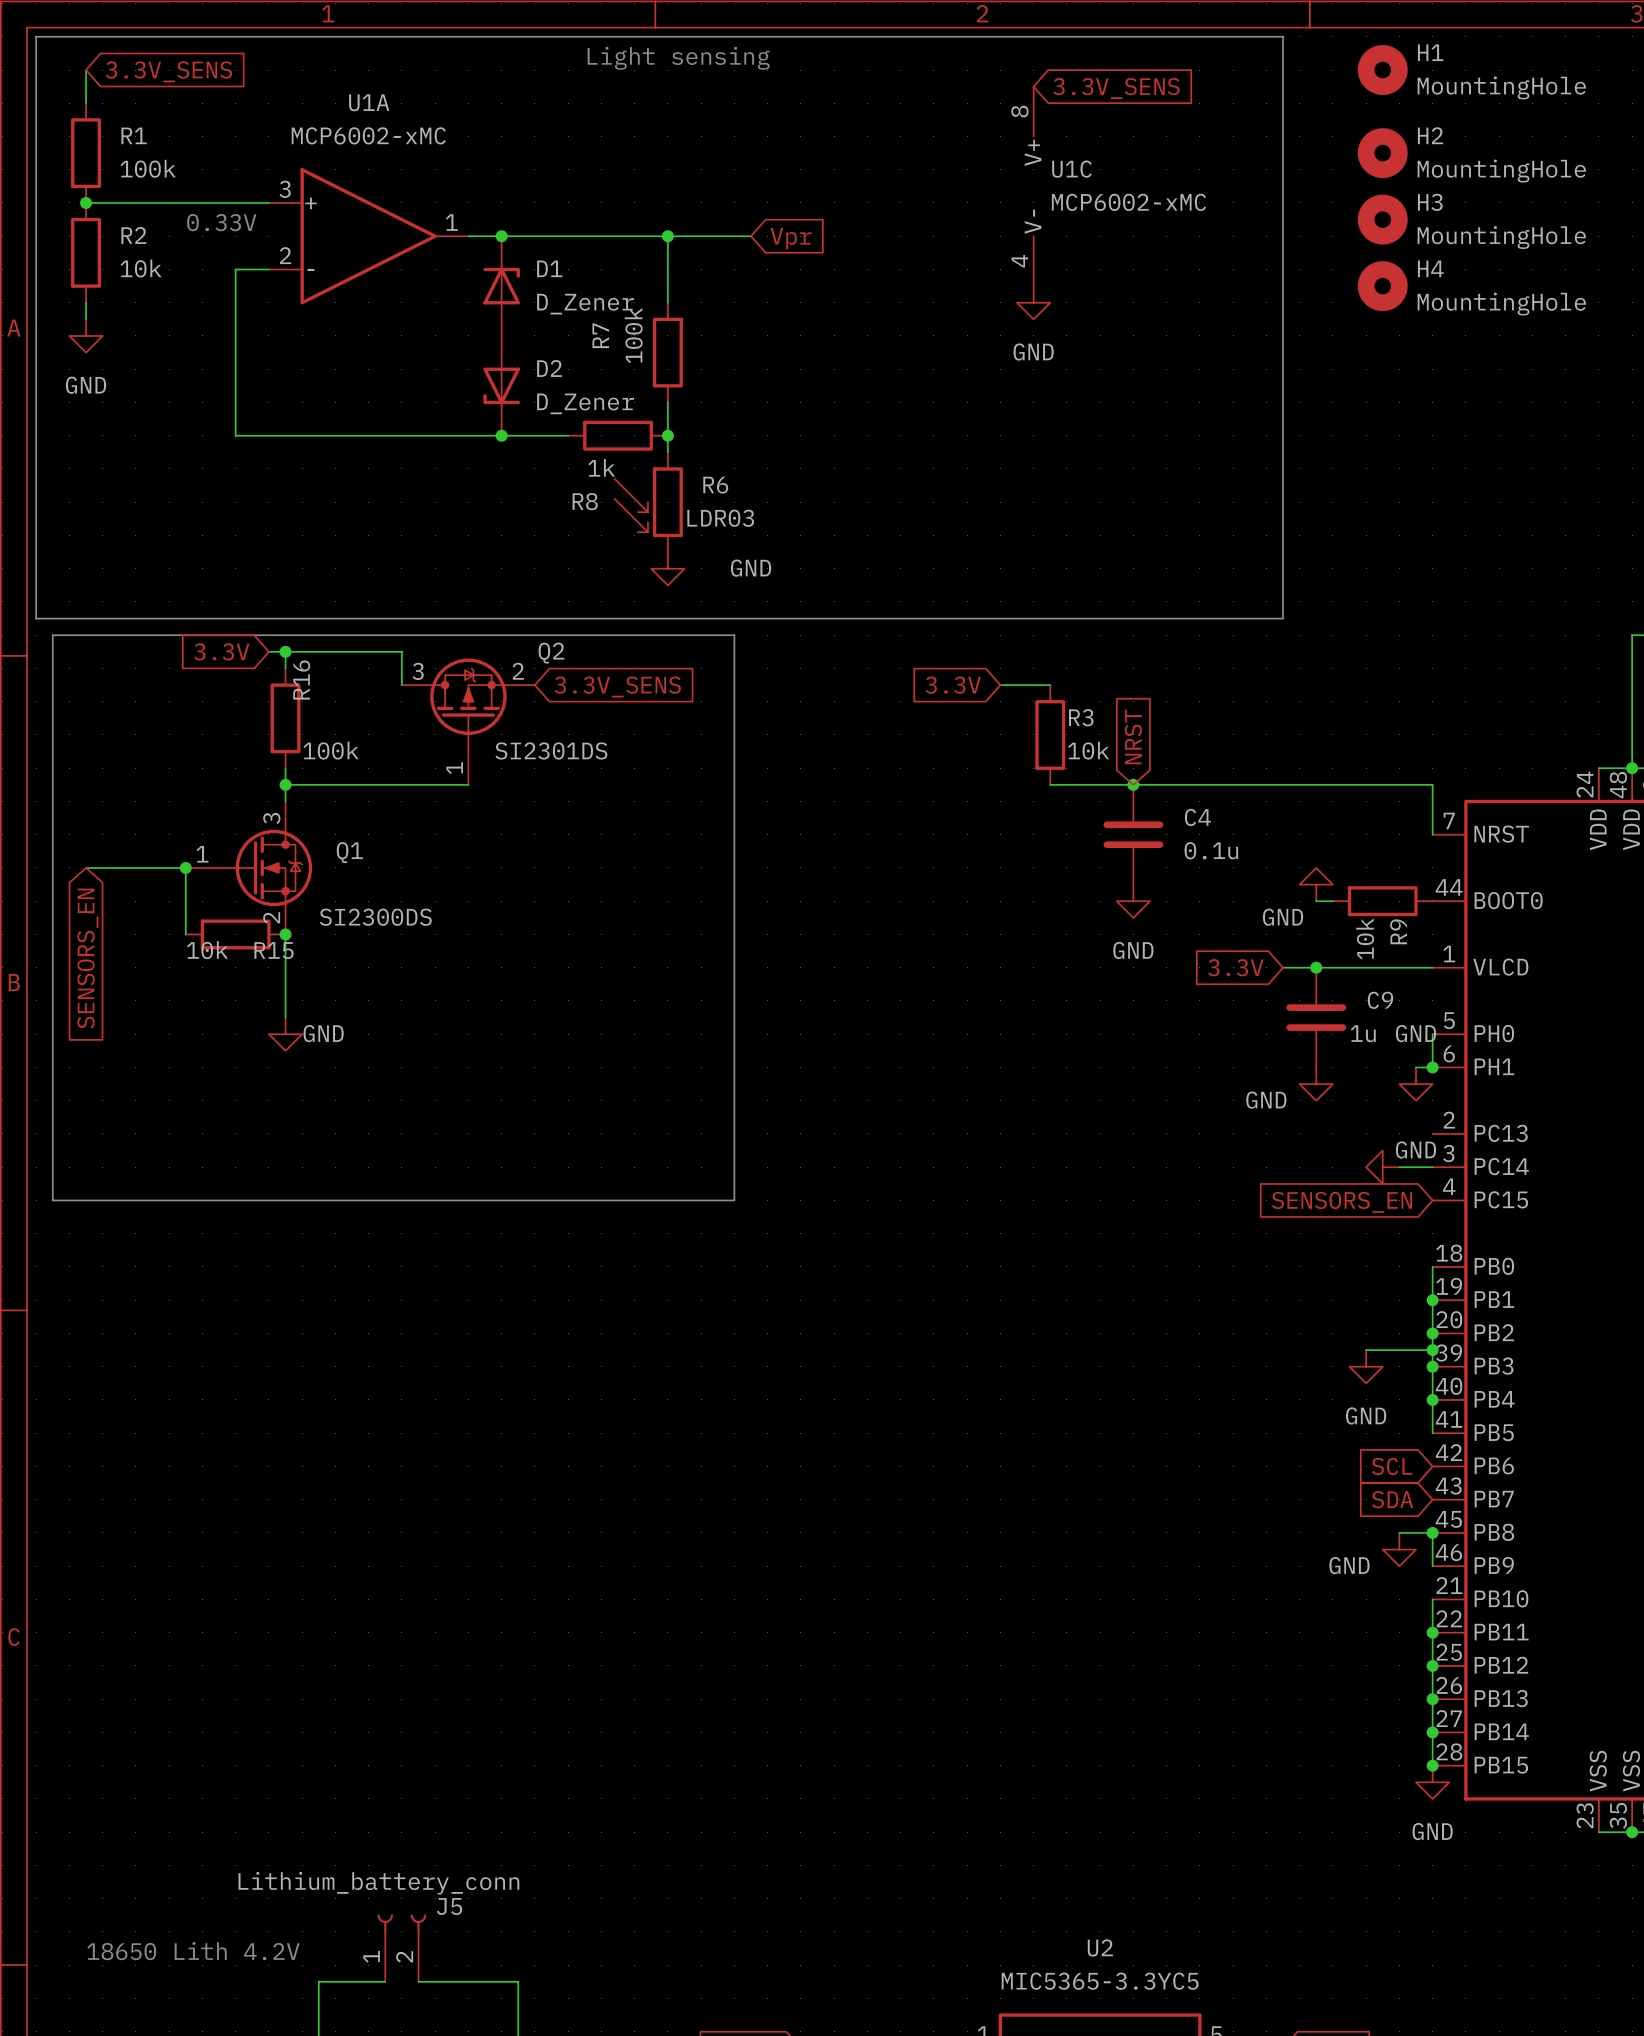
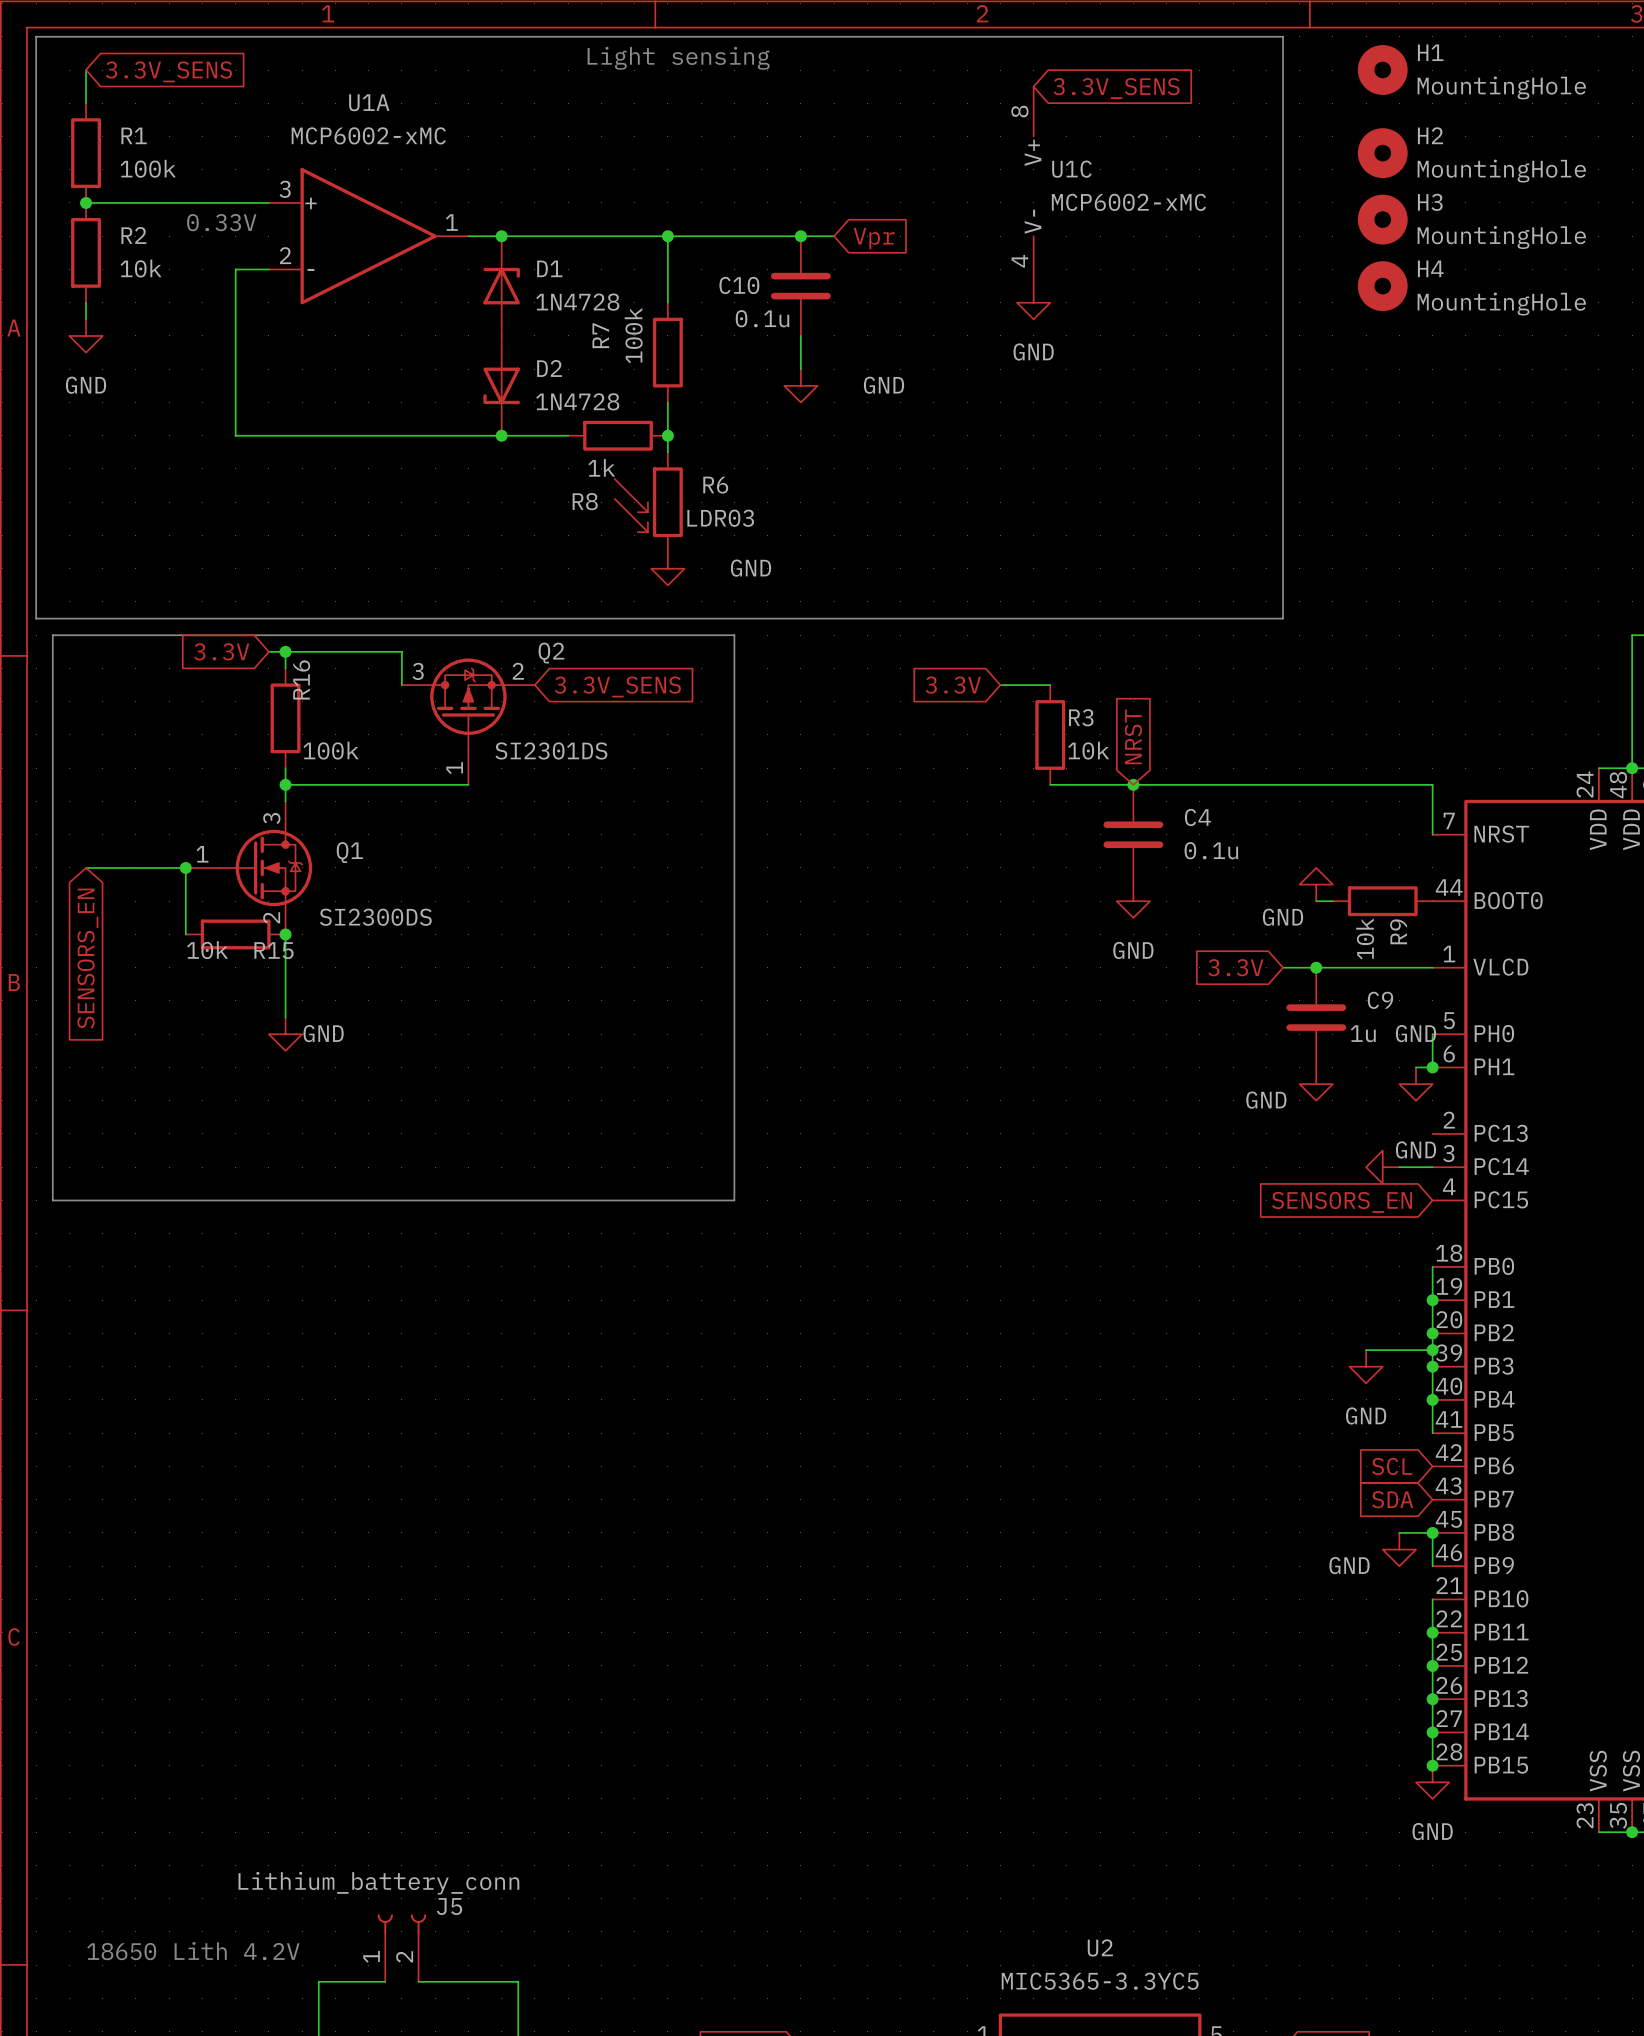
wire: none -> (751, 236) (834, 236)
junction: none -> (800, 236)
global label position: Vpr (791, 238) -> Vpr (874, 238)
C10: none -> 0.1u (800, 286)
D1 value: D_Zener (585, 304) -> 1N4728 (577, 302)
wire: none -> (800, 335) (800, 369)
power symbol: none -> GND (800, 385)
D2 value: D_Zener (585, 403) -> 1N4728 (577, 401)

